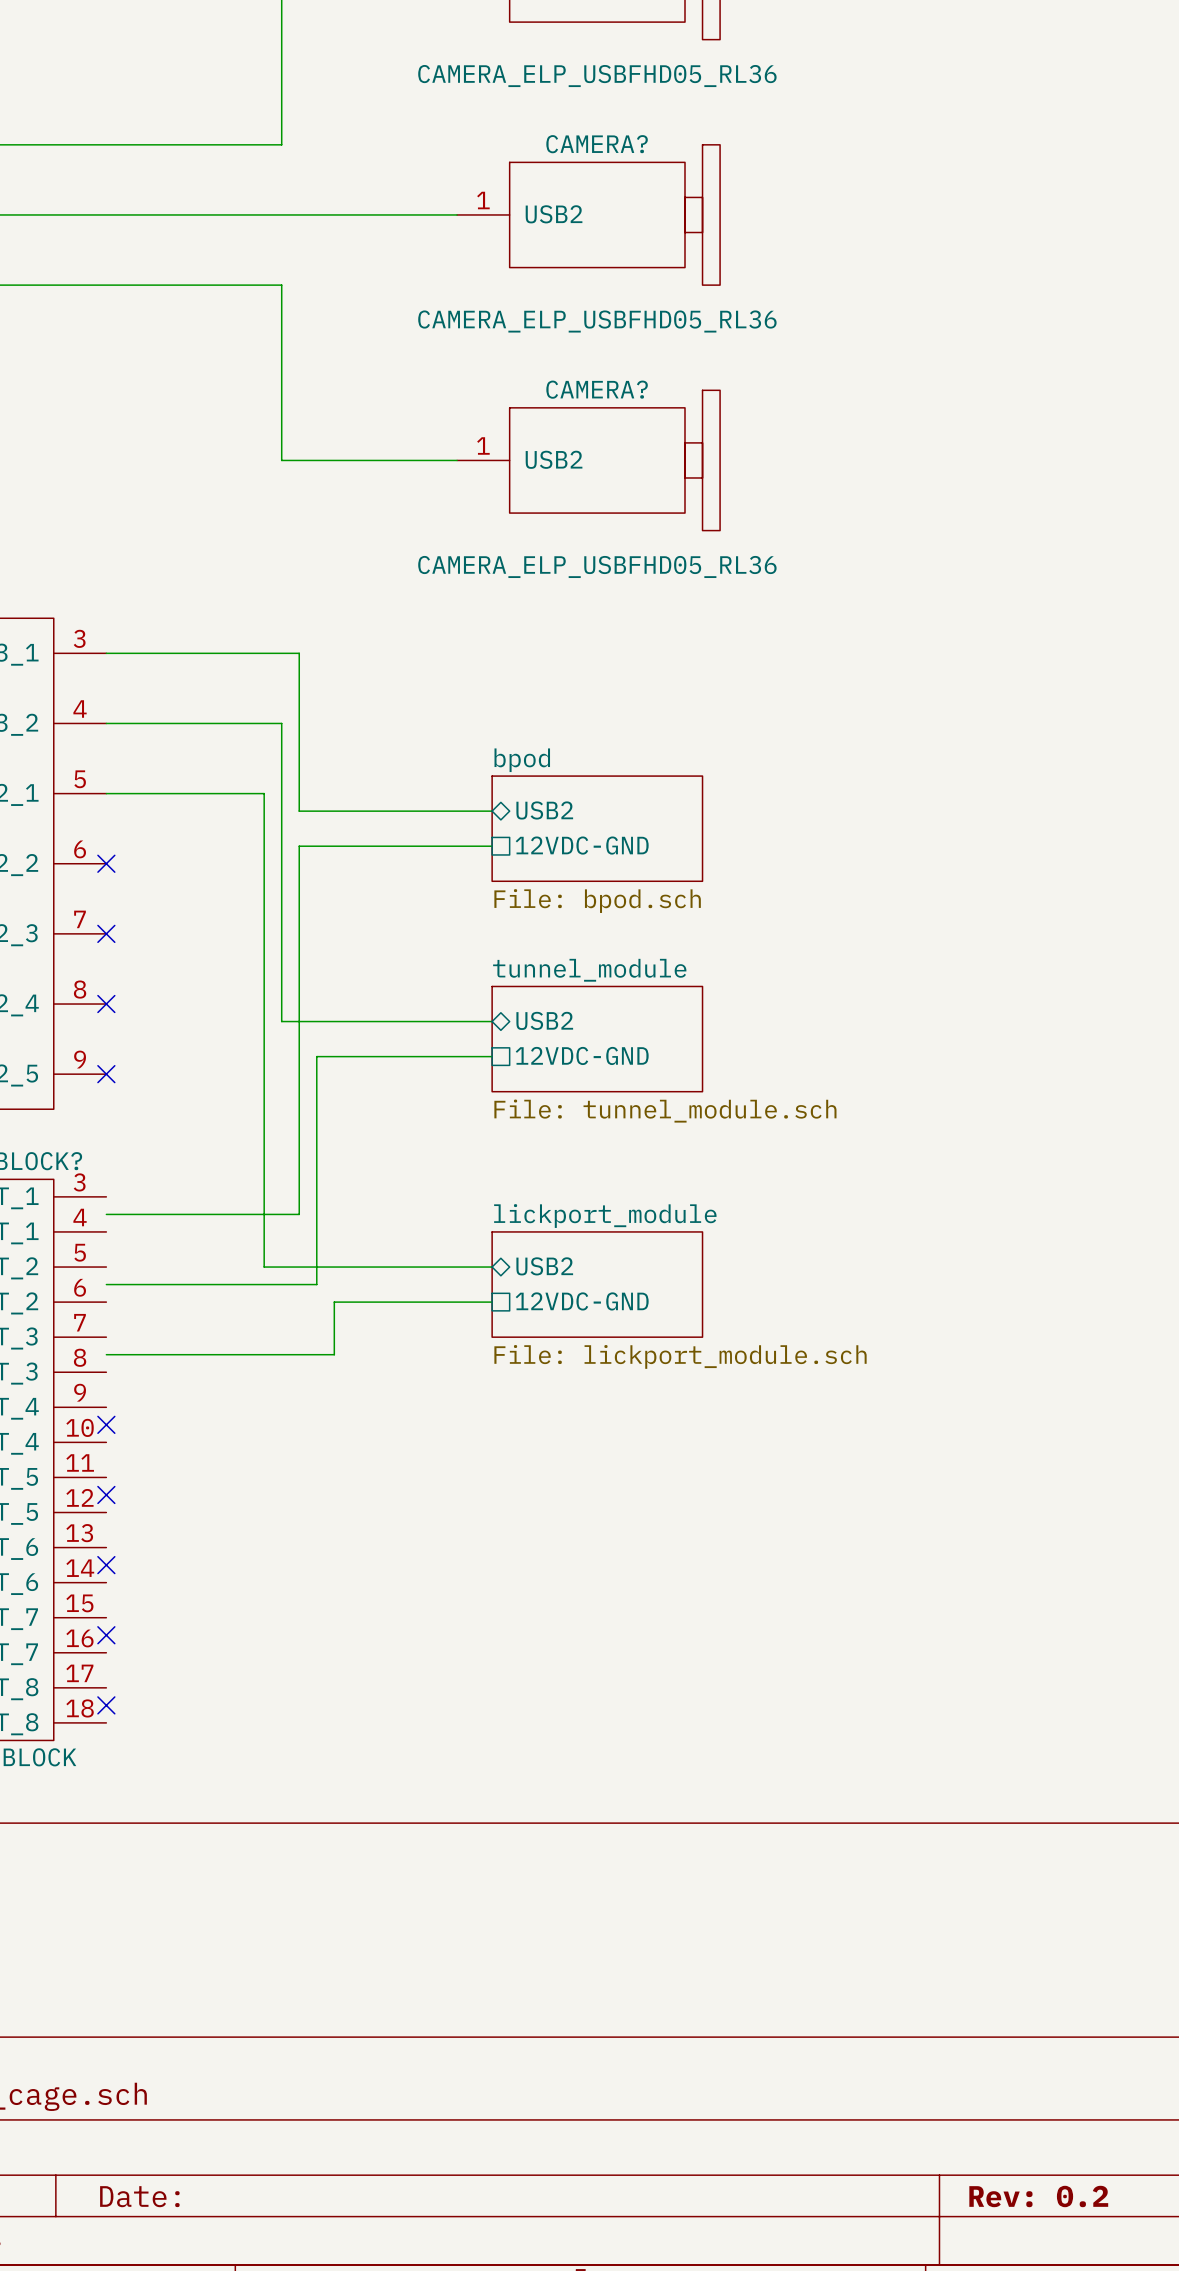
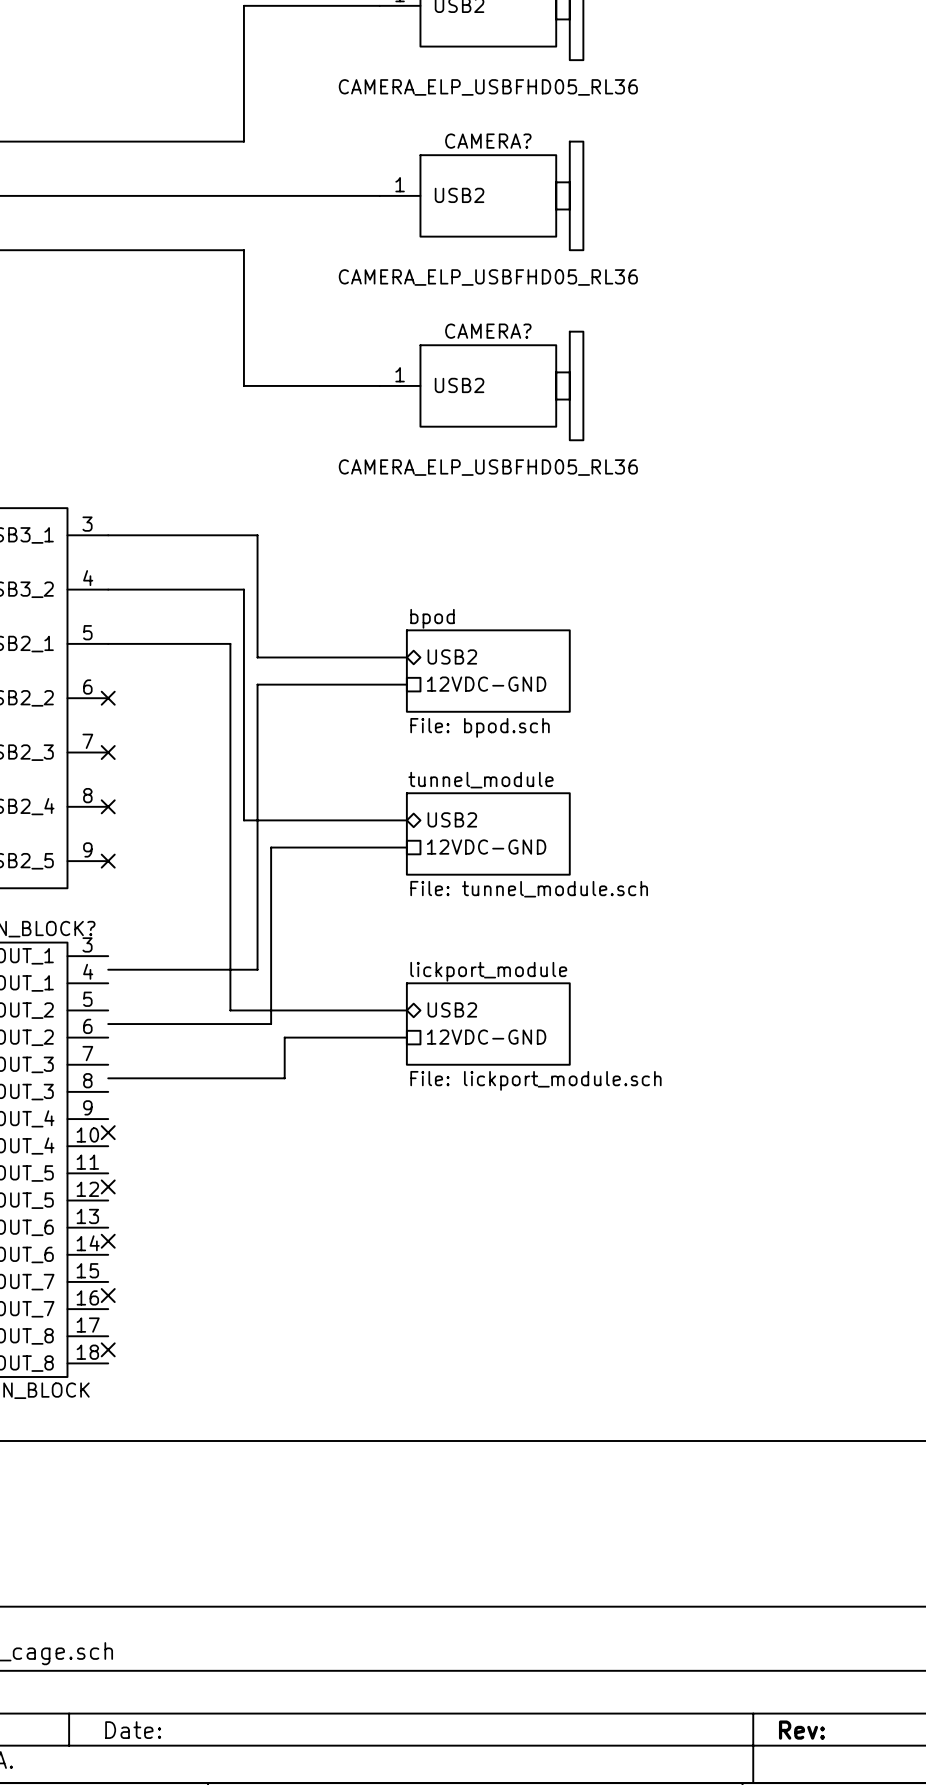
title block: Rev: 0.2 (1038, 2196) -> Rev: (801, 1730)

